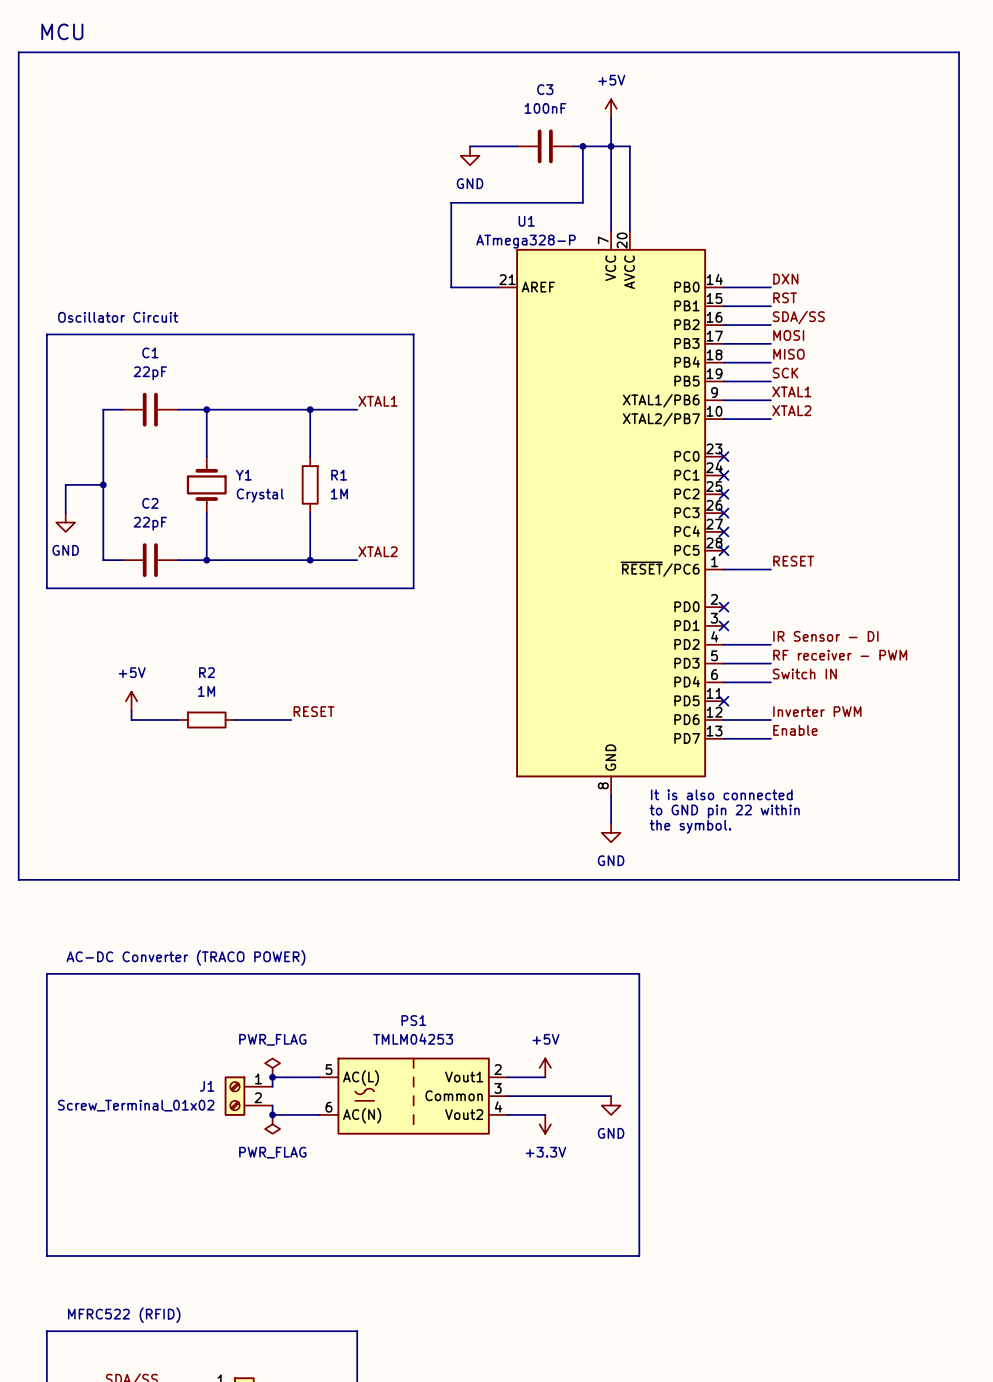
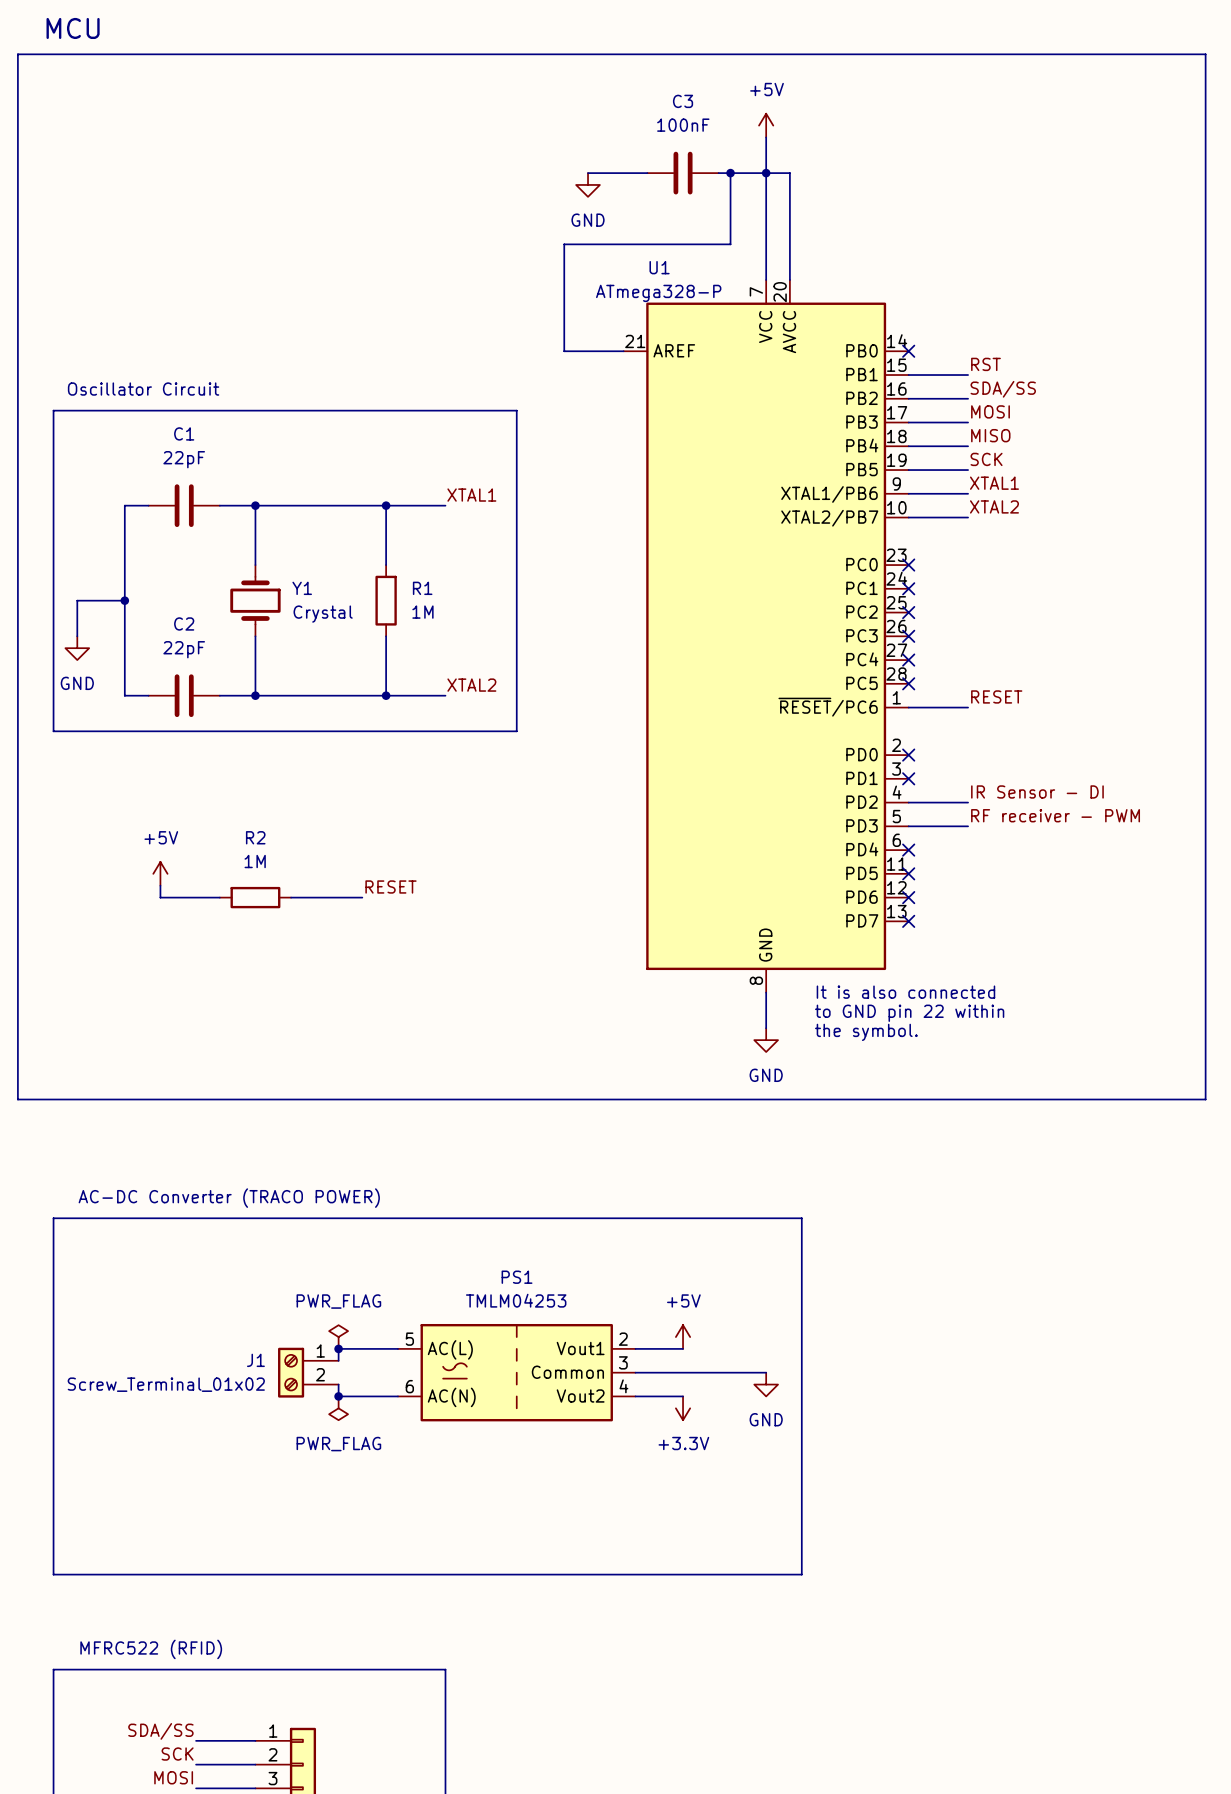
label: DXN (785, 279) -> none
wire: (723, 287) (770, 287) -> none
no-connect mark: none -> (908, 351)
label: Switch IN (804, 673) -> none
wire: (723, 682) (770, 682) -> none
no-connect mark: none -> (908, 850)
label: Inverter PWM (817, 711) -> none
wire: (723, 720) (770, 720) -> none
no-connect mark: none -> (908, 897)
label: Enable (795, 730) -> none
wire: (723, 738) (770, 738) -> none
no-connect mark: none -> (908, 921)

